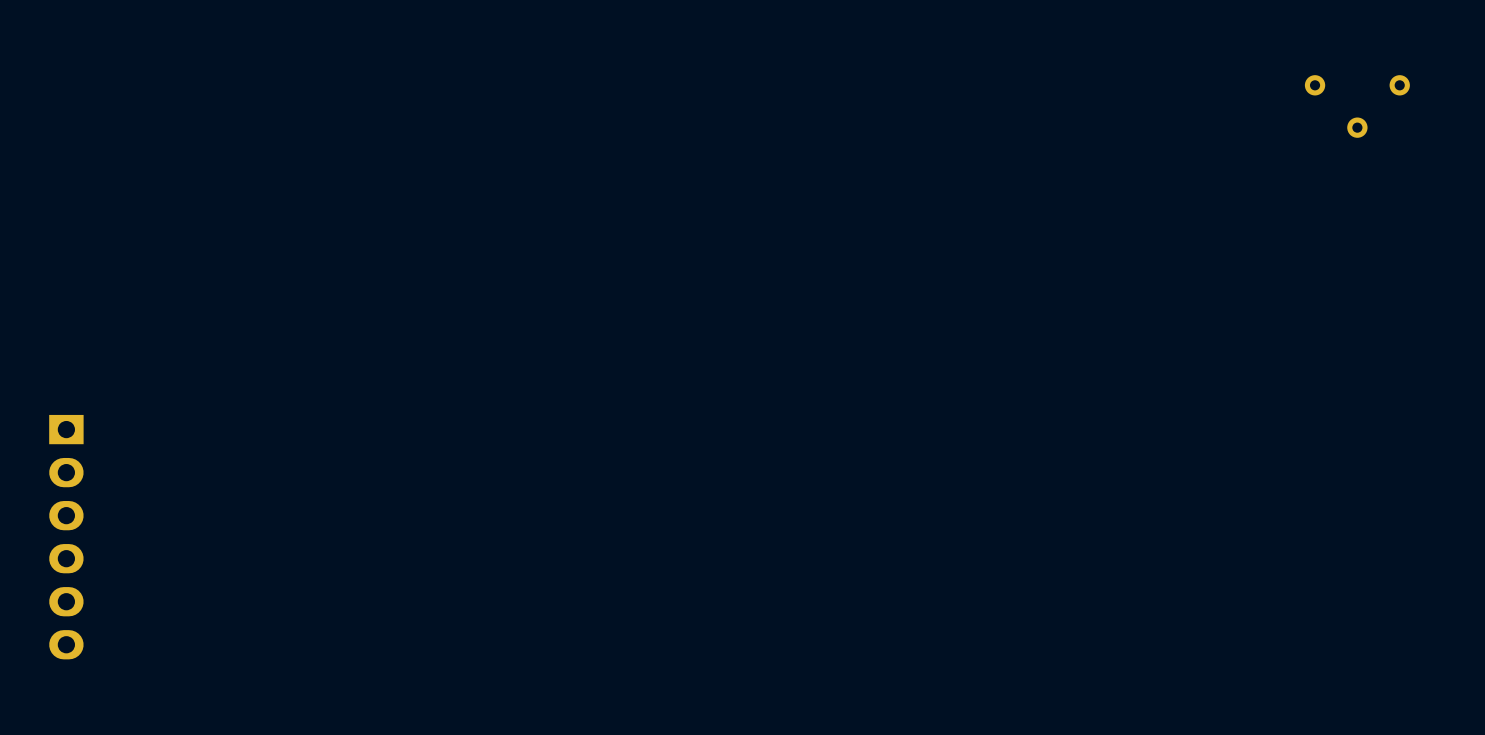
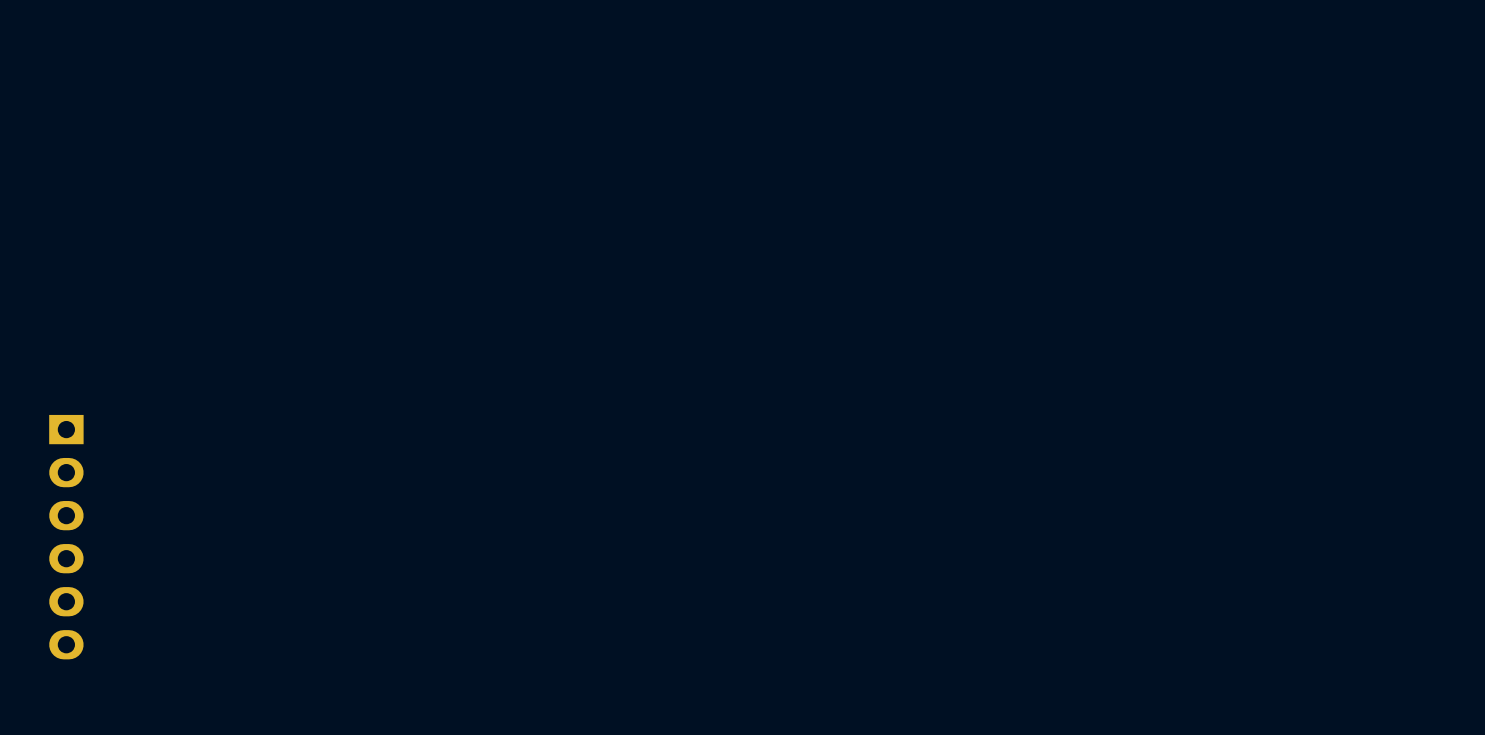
part: (1357, 106) -> none

